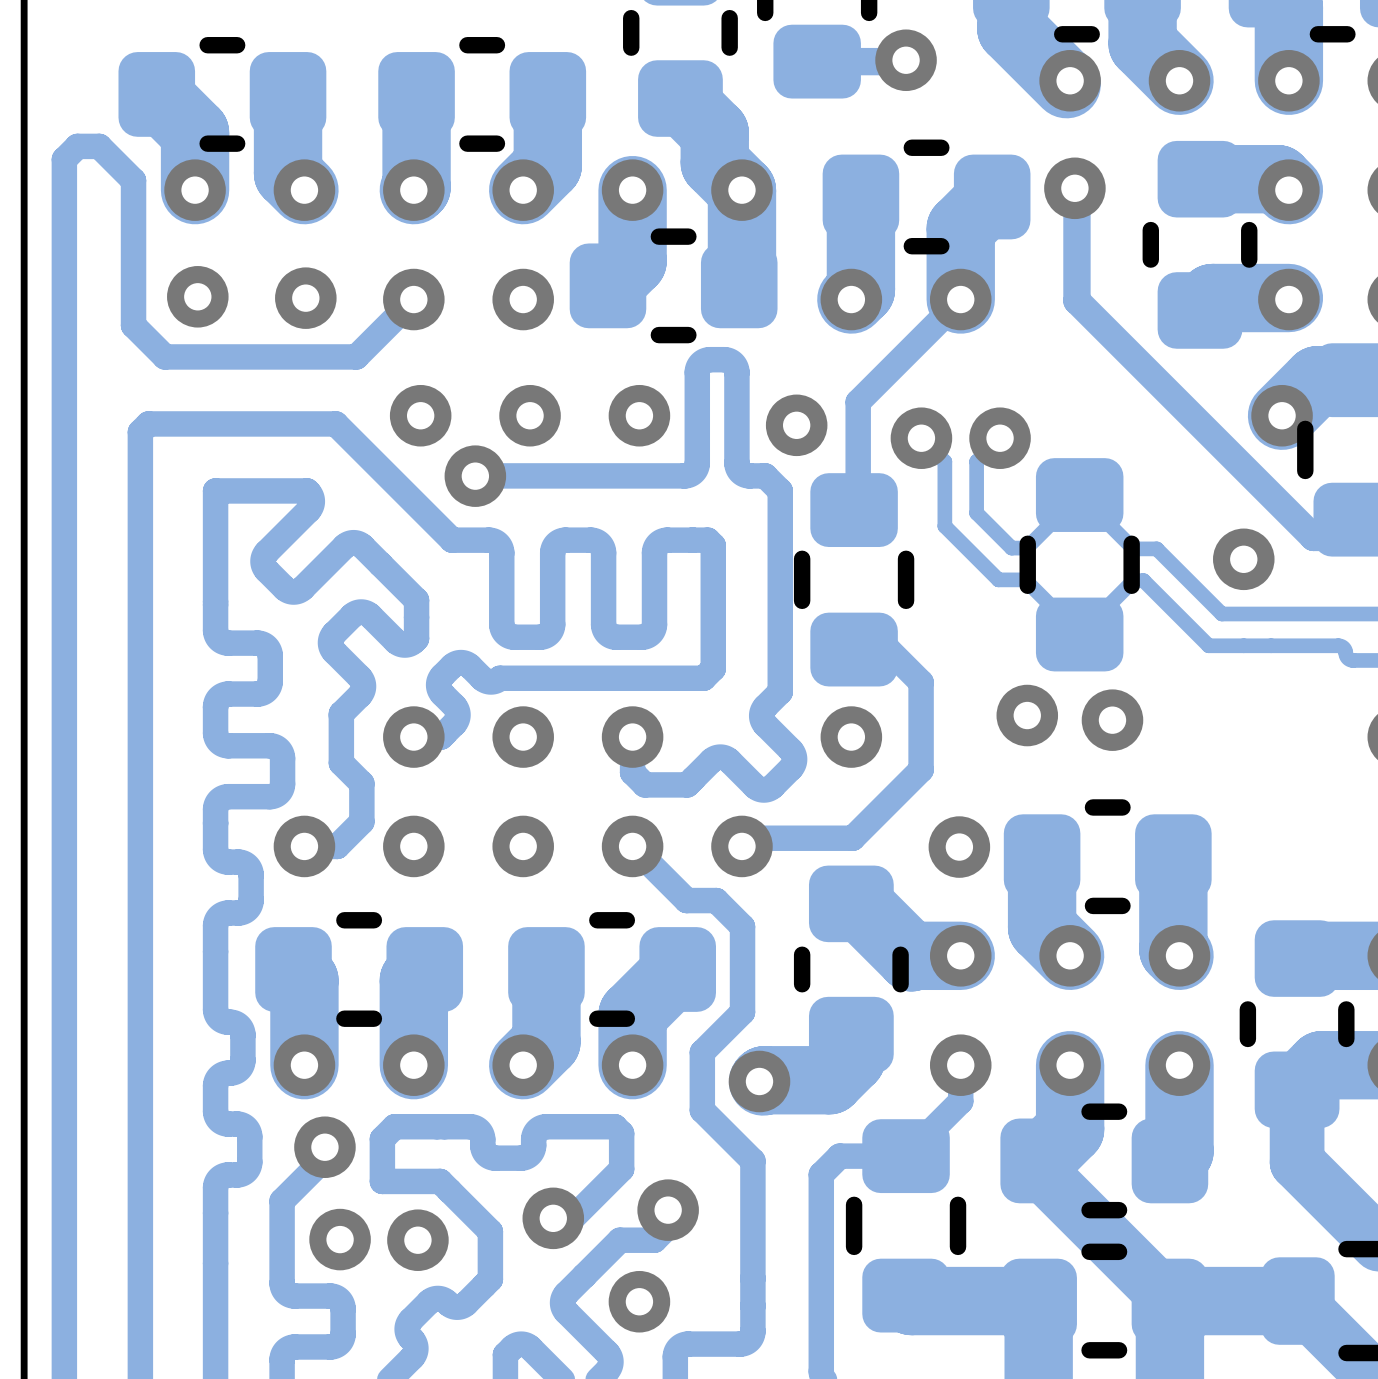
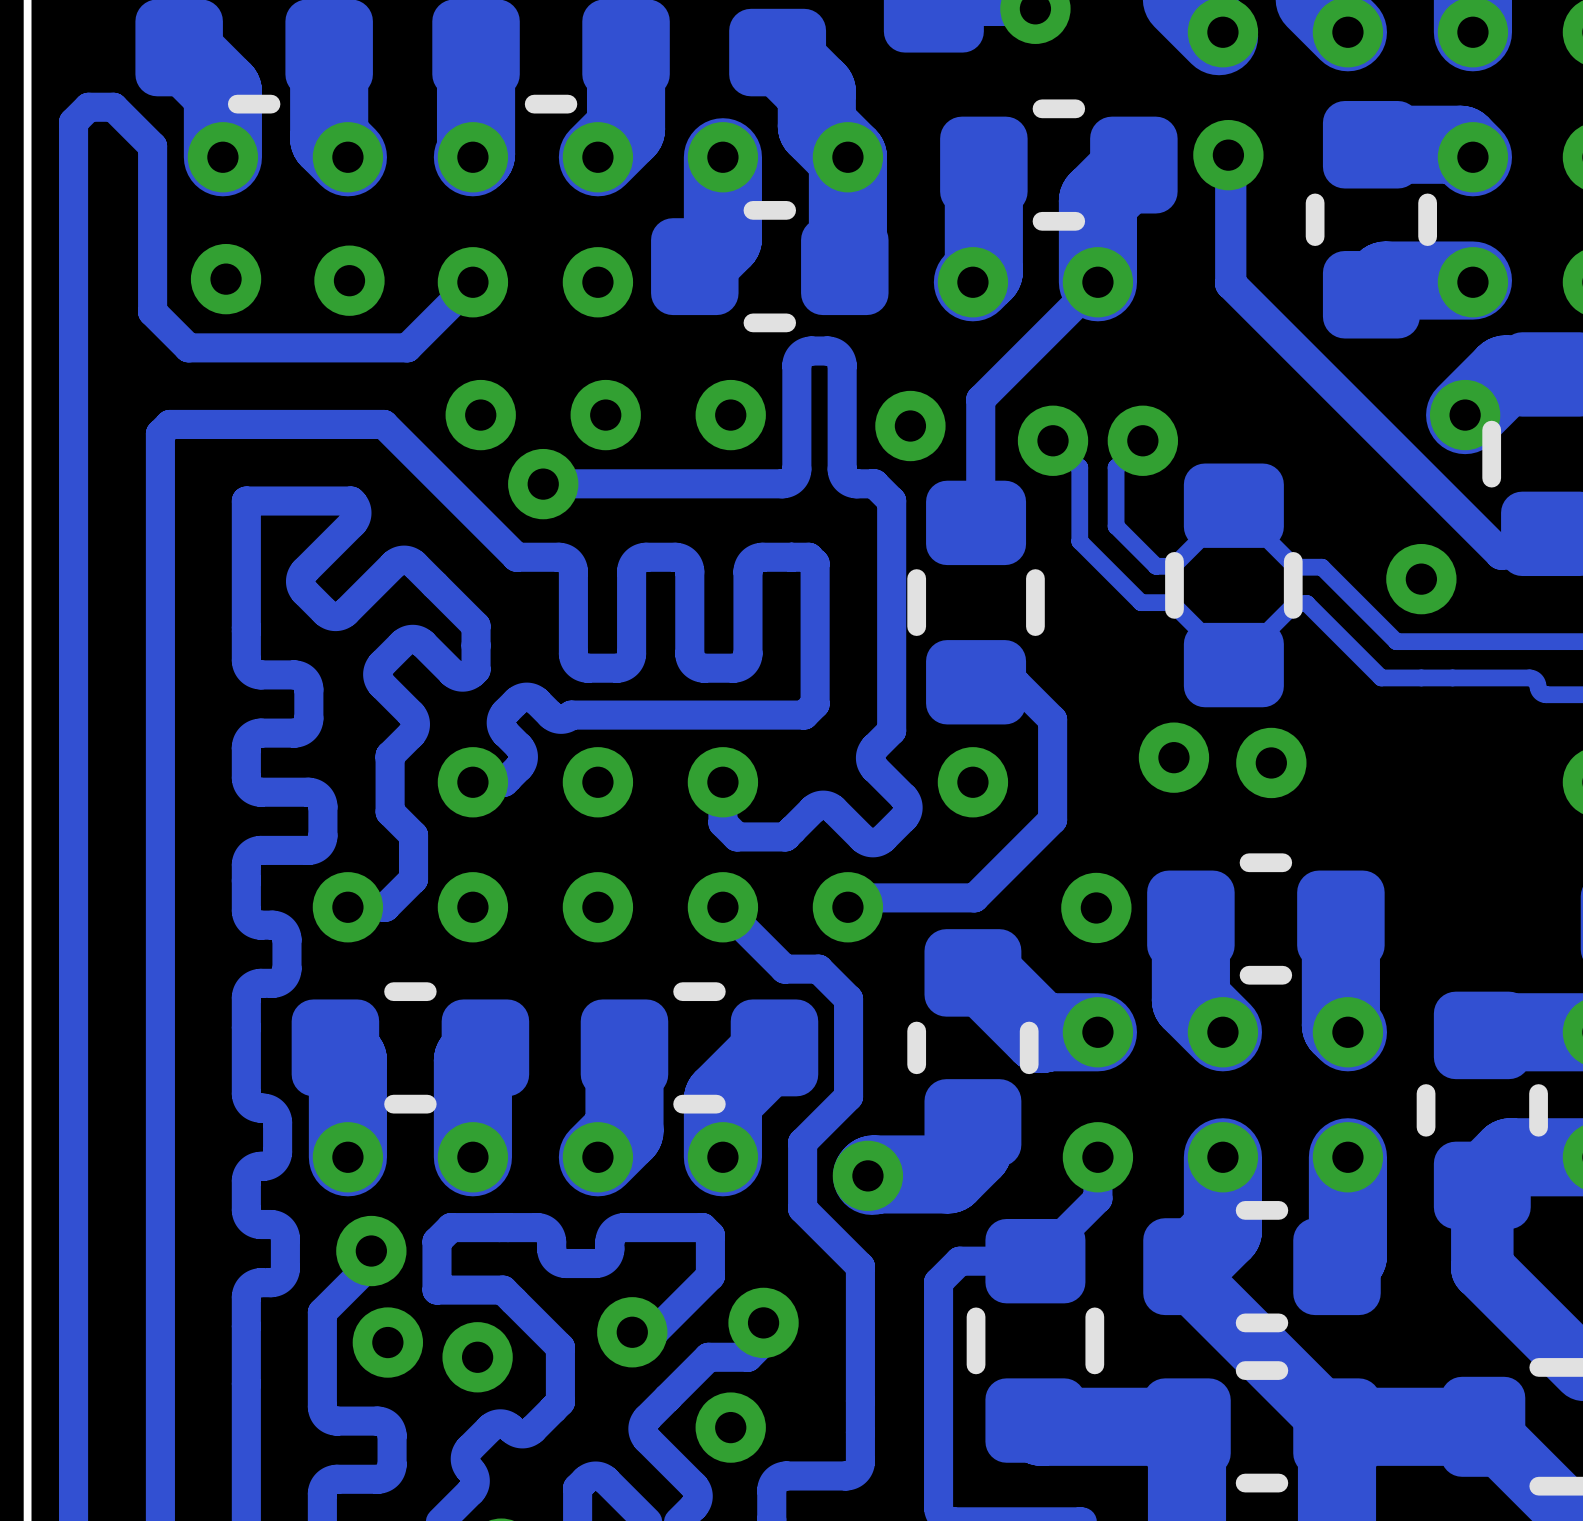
via position: (340, 1239) -> (387, 1342)

